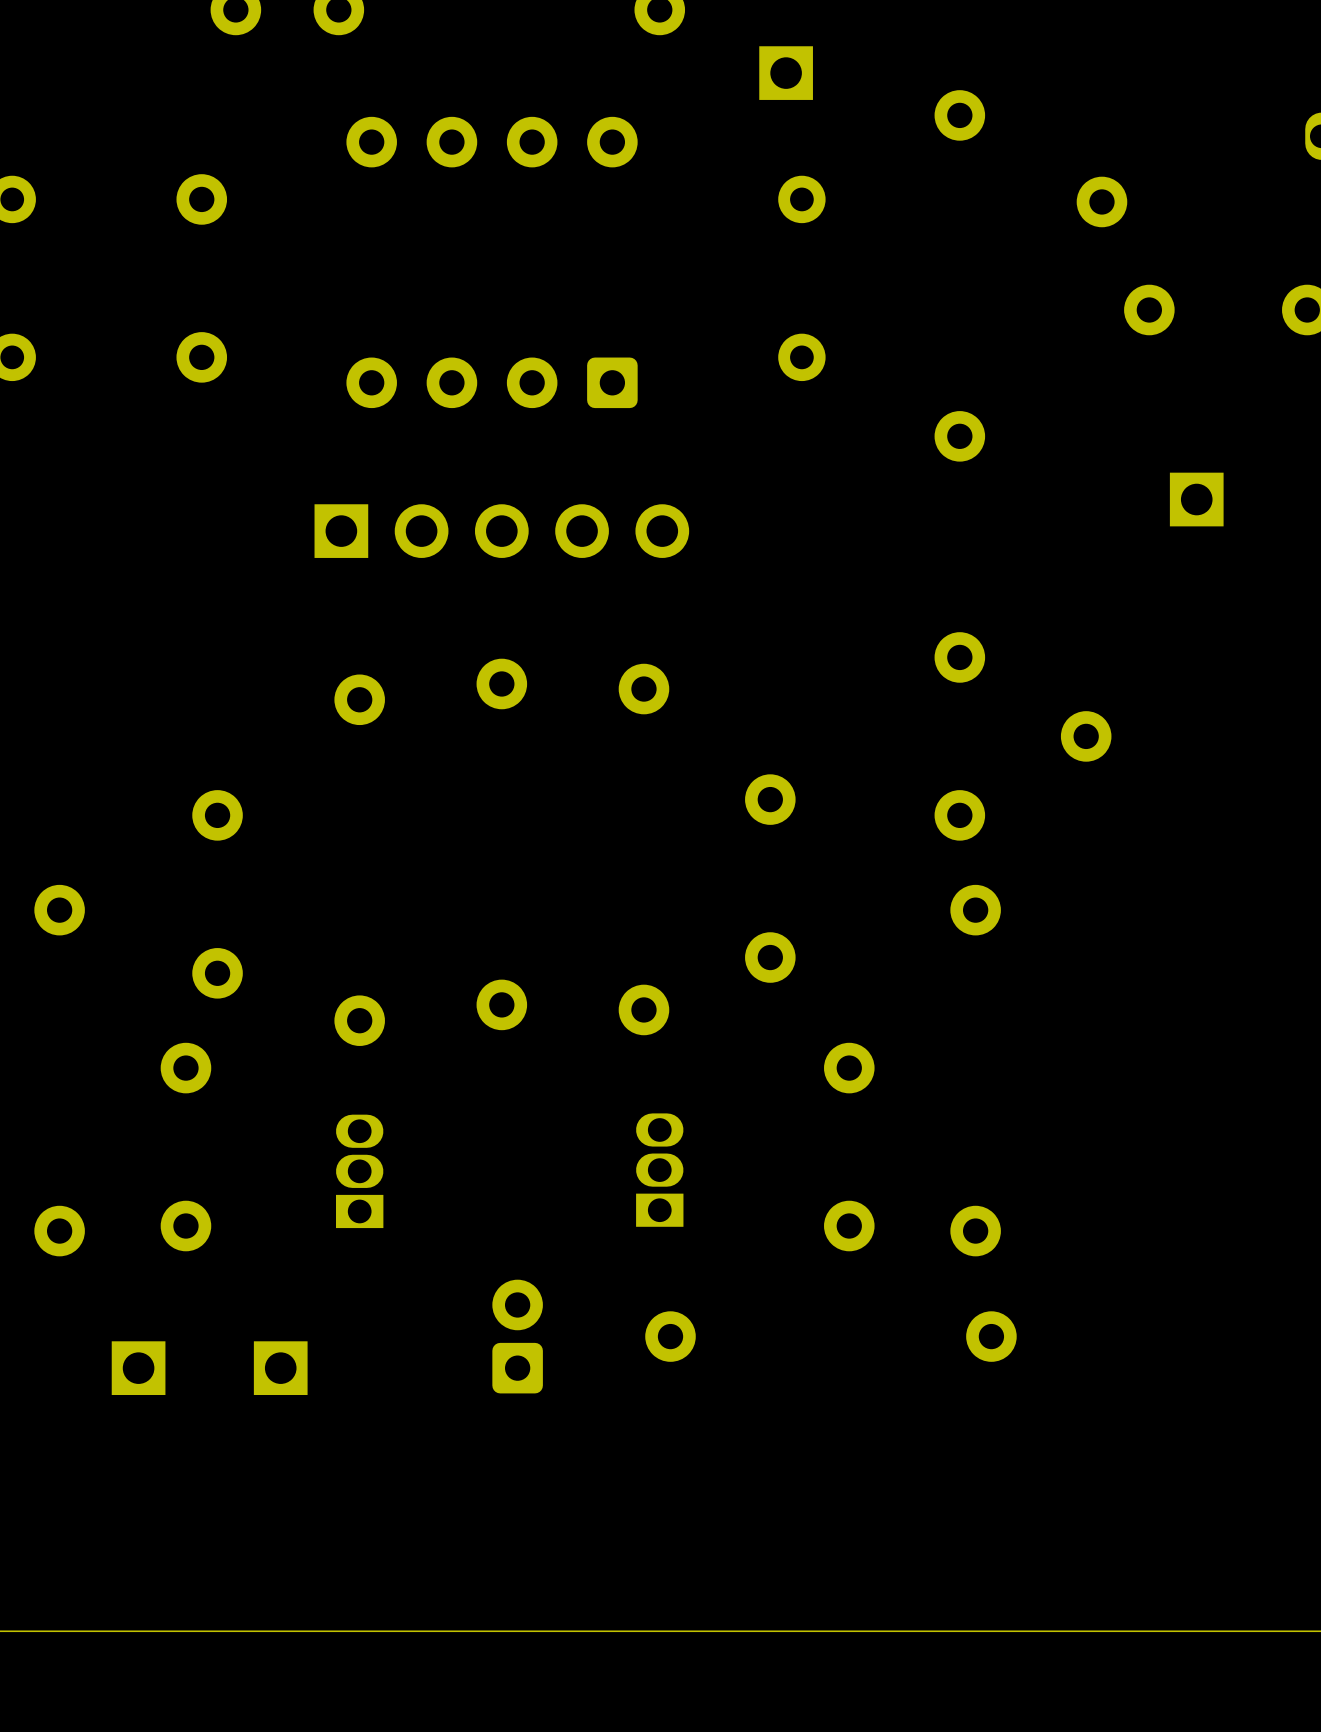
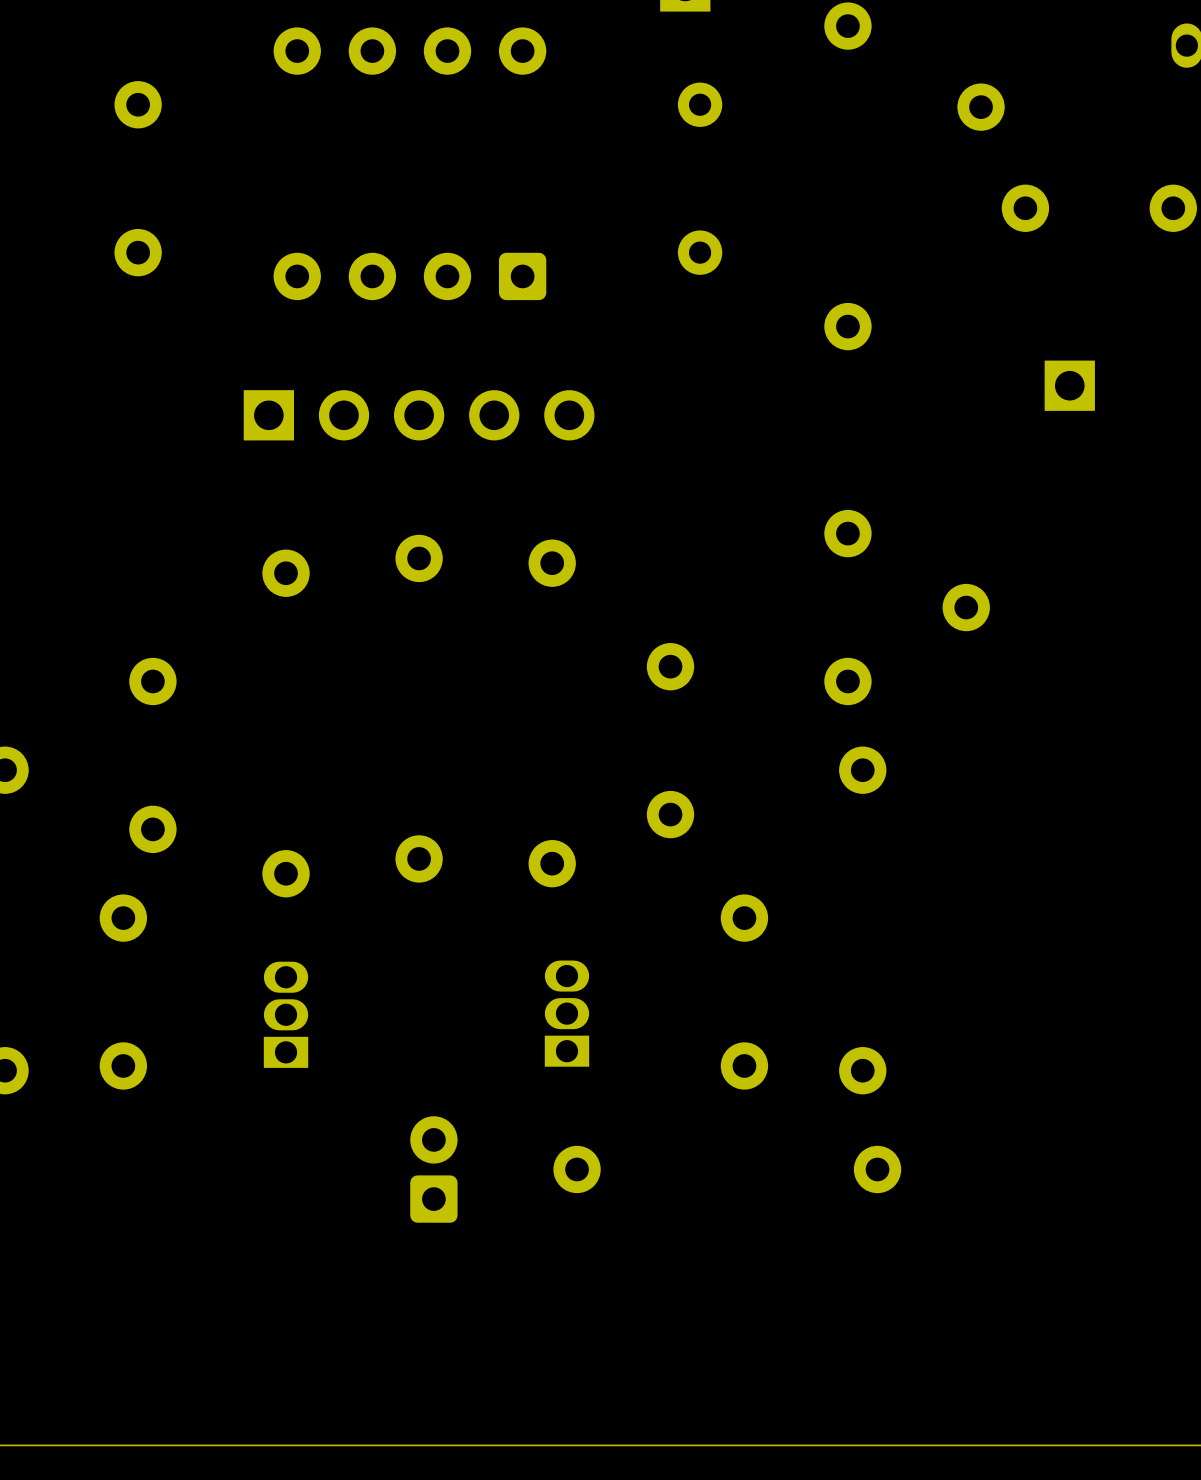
part: (138, 1368) -> none
part: (280, 1368) -> none

